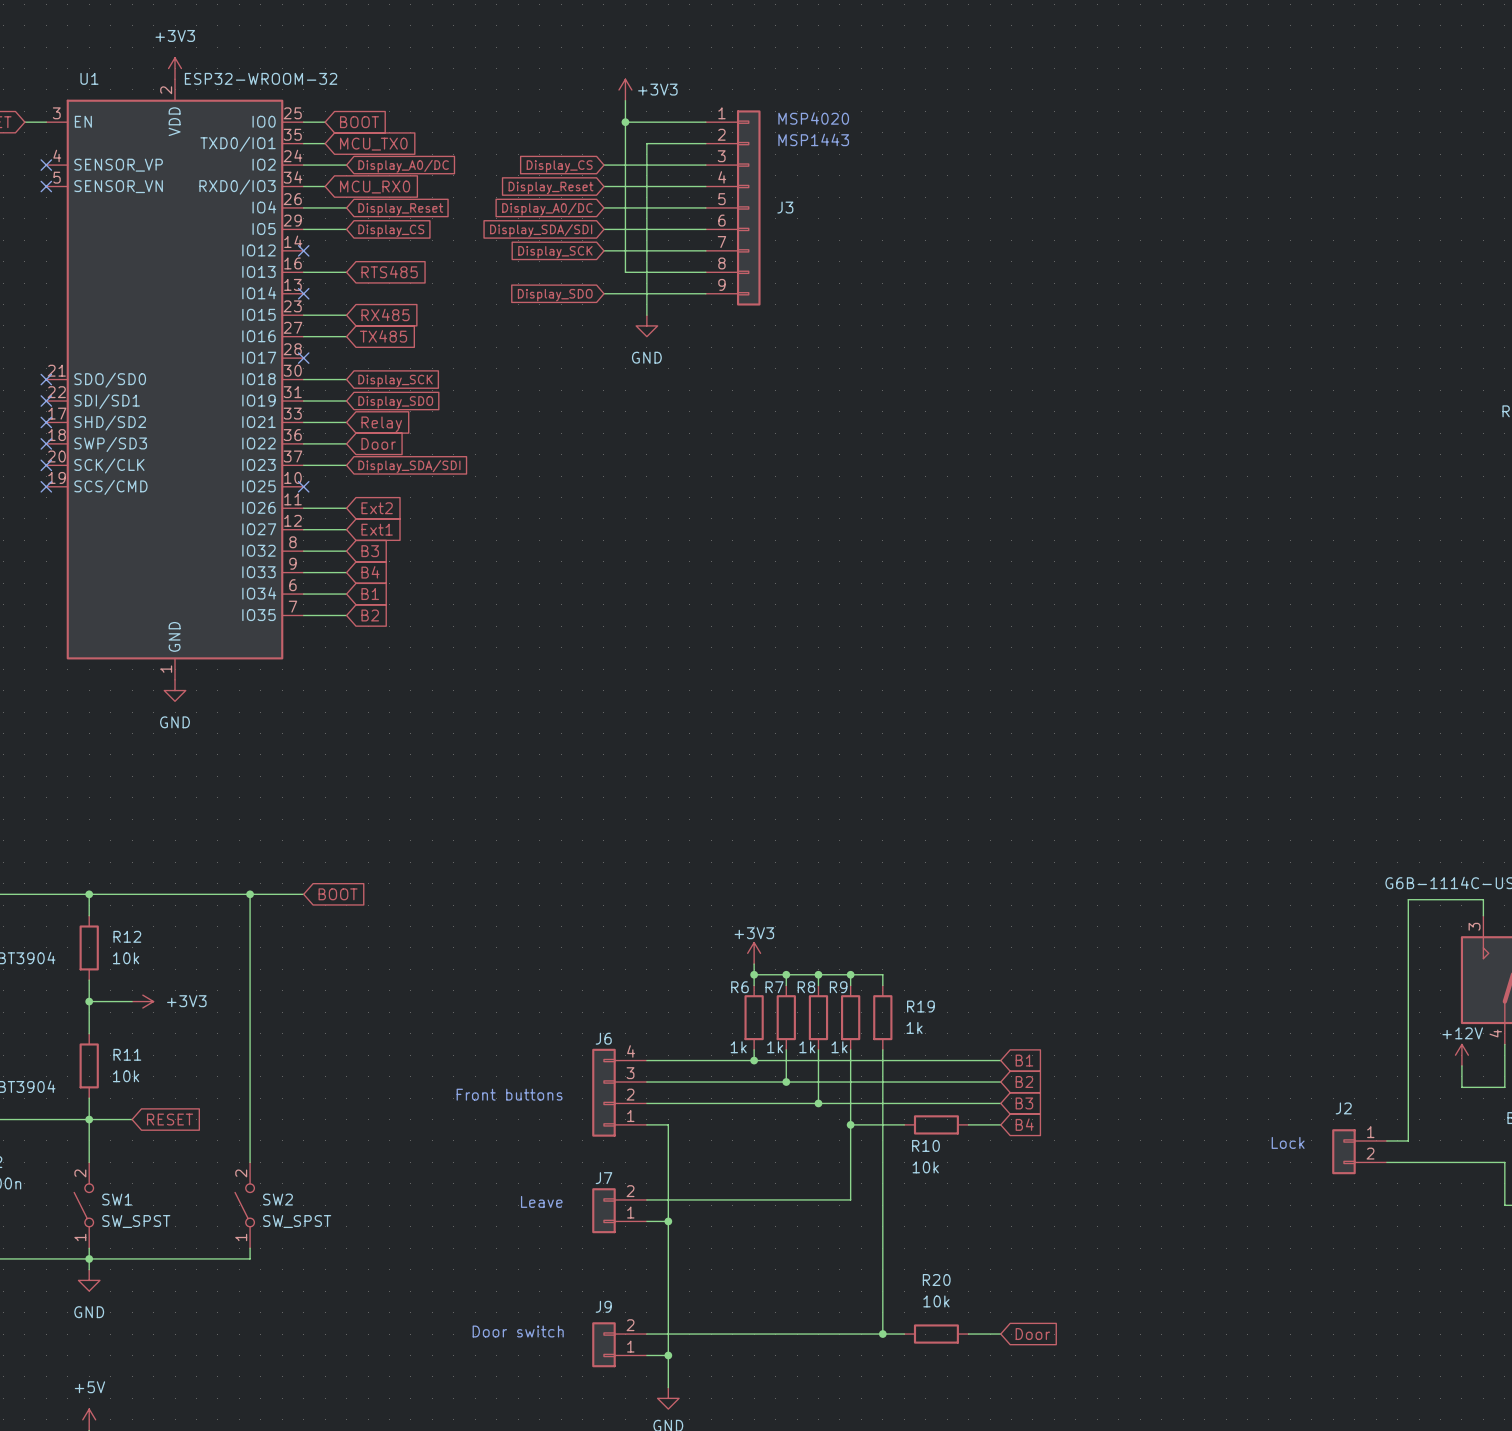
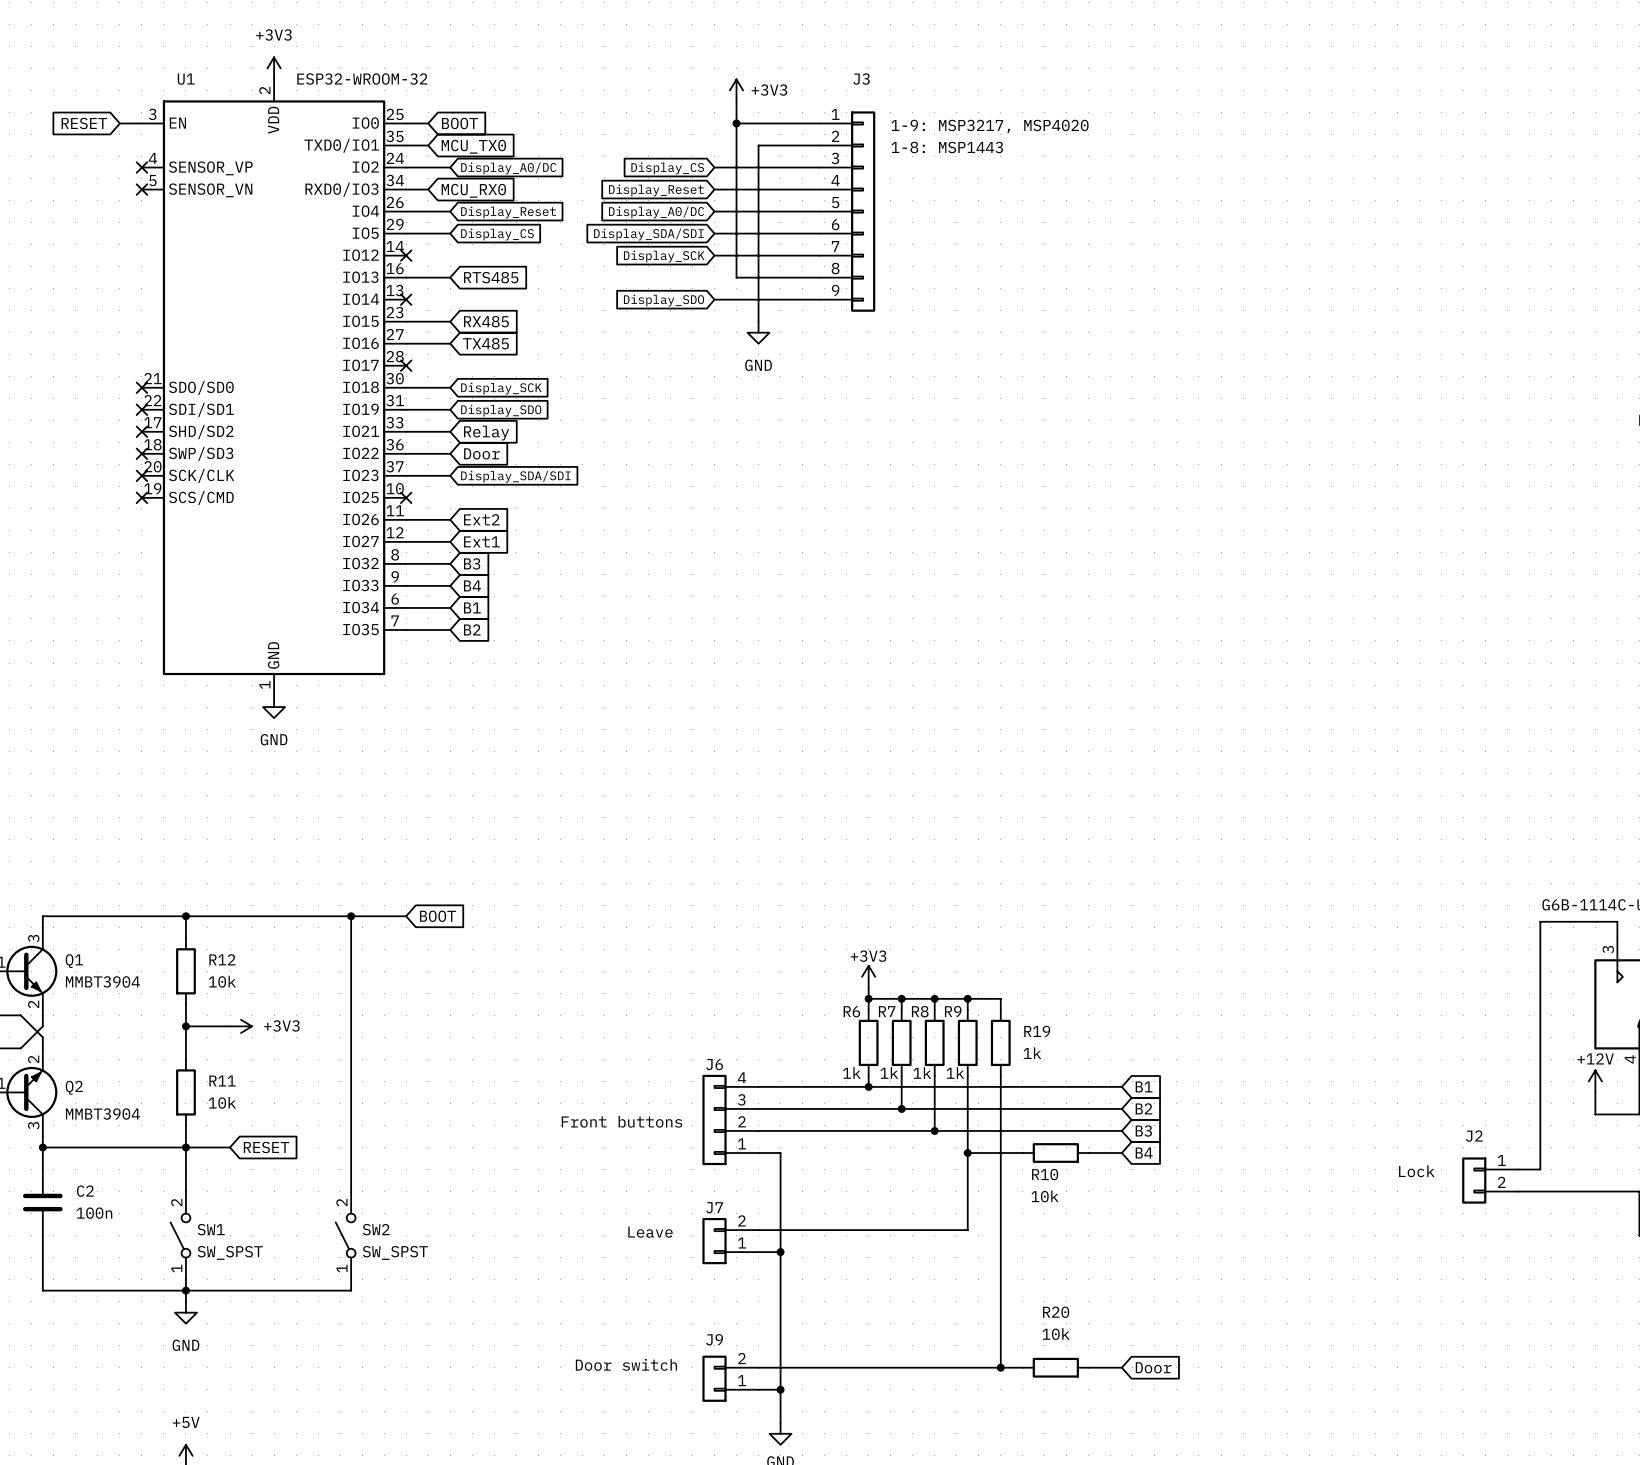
text: MSP4020 (813, 118) -> 1-9: MSP3217, MSP4020 (990, 126)
text: MSP1443 (813, 139) -> 1-8: MSP1443 (947, 147)
J3 name position: J3 (785, 207) -> J3 (861, 79)

